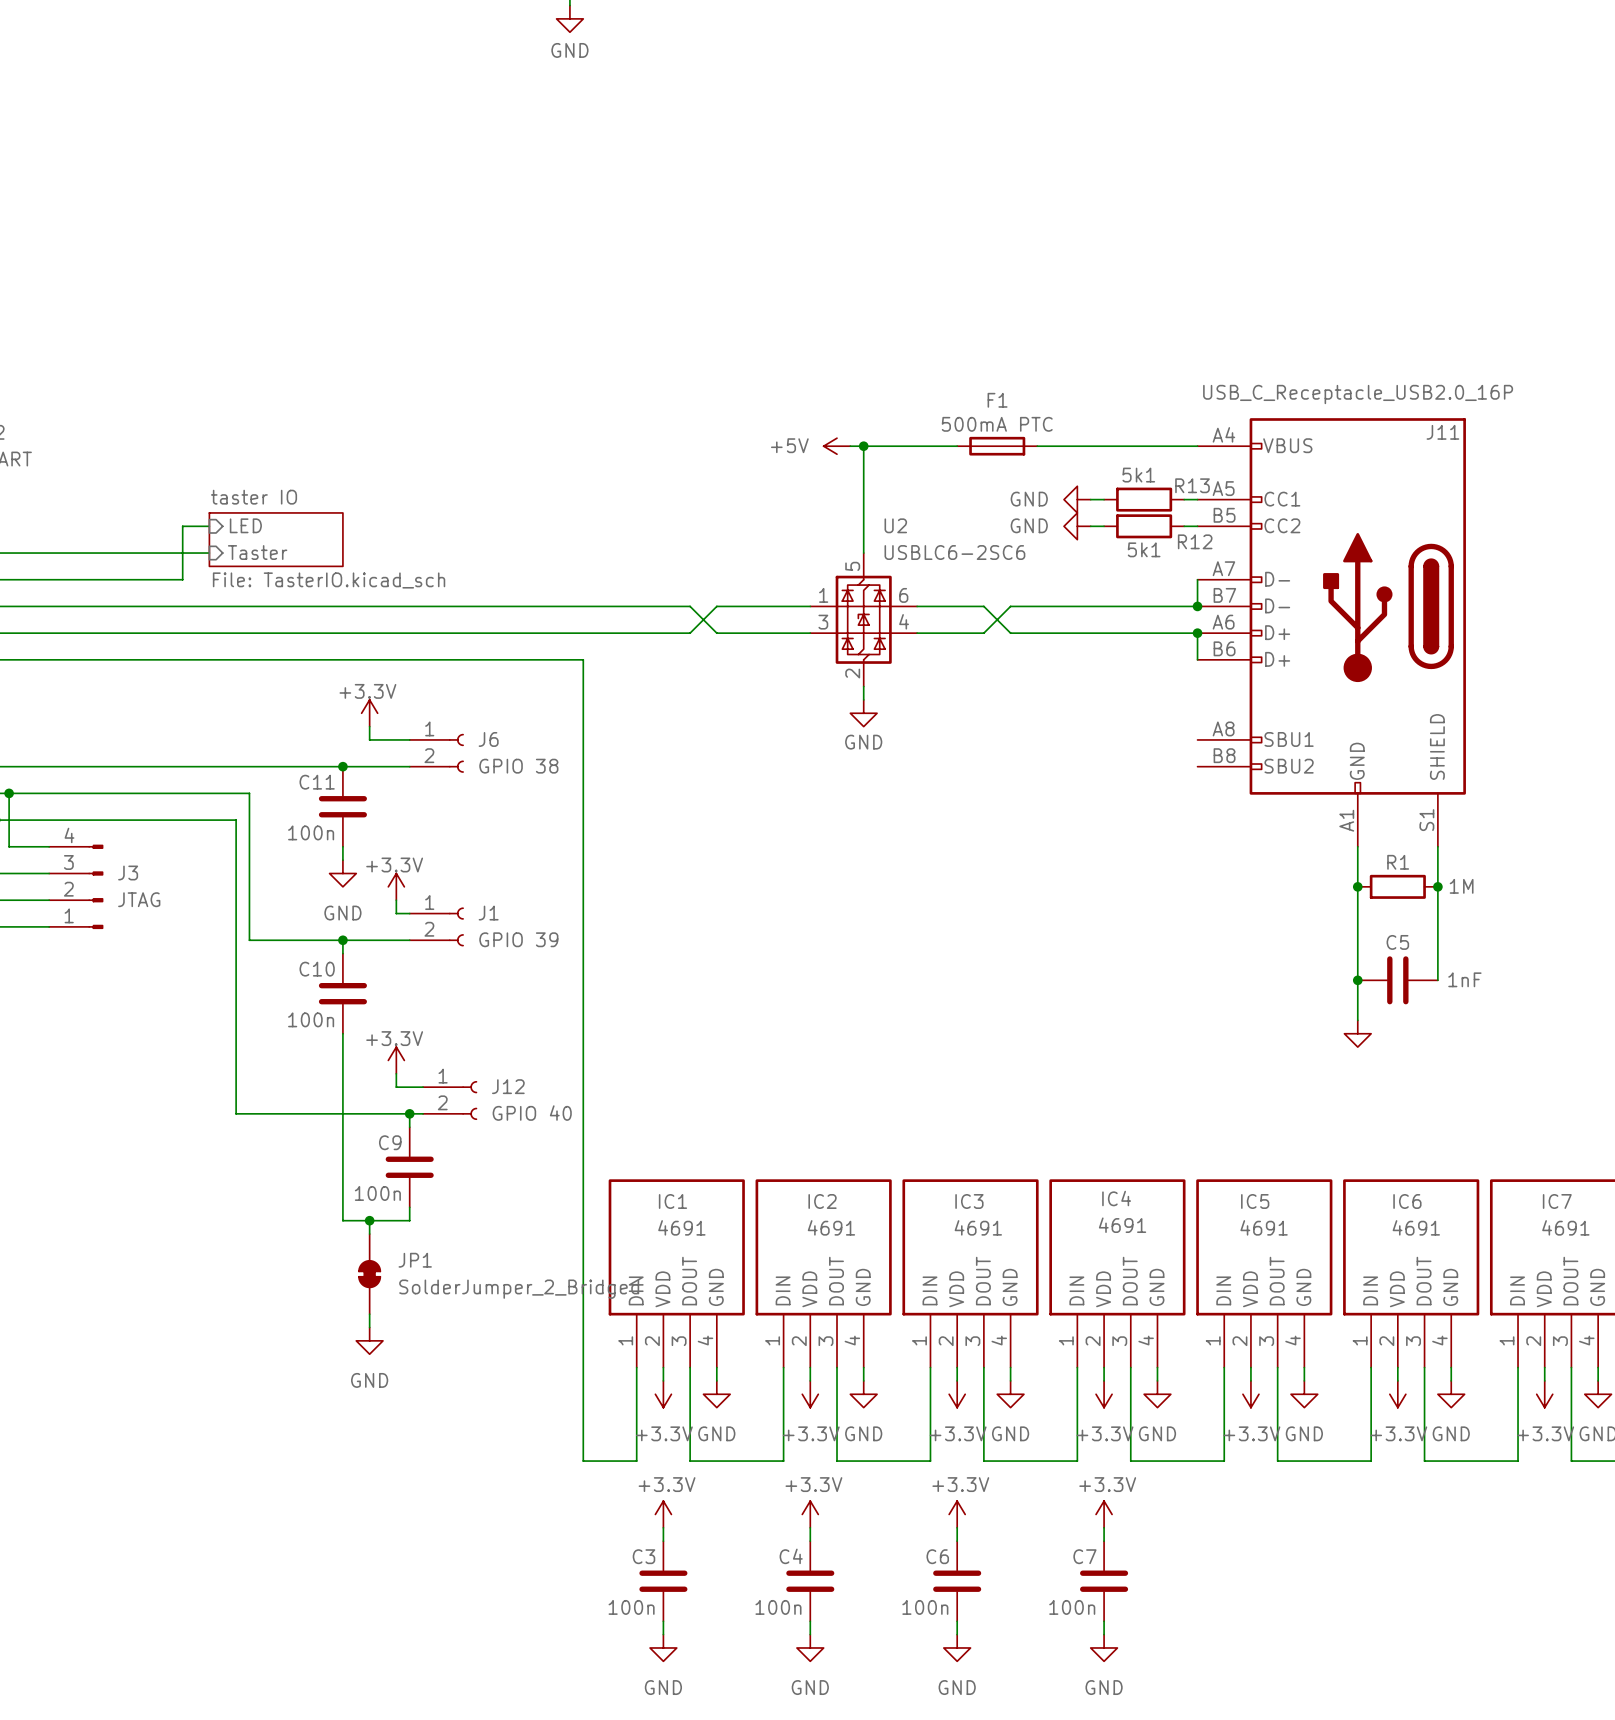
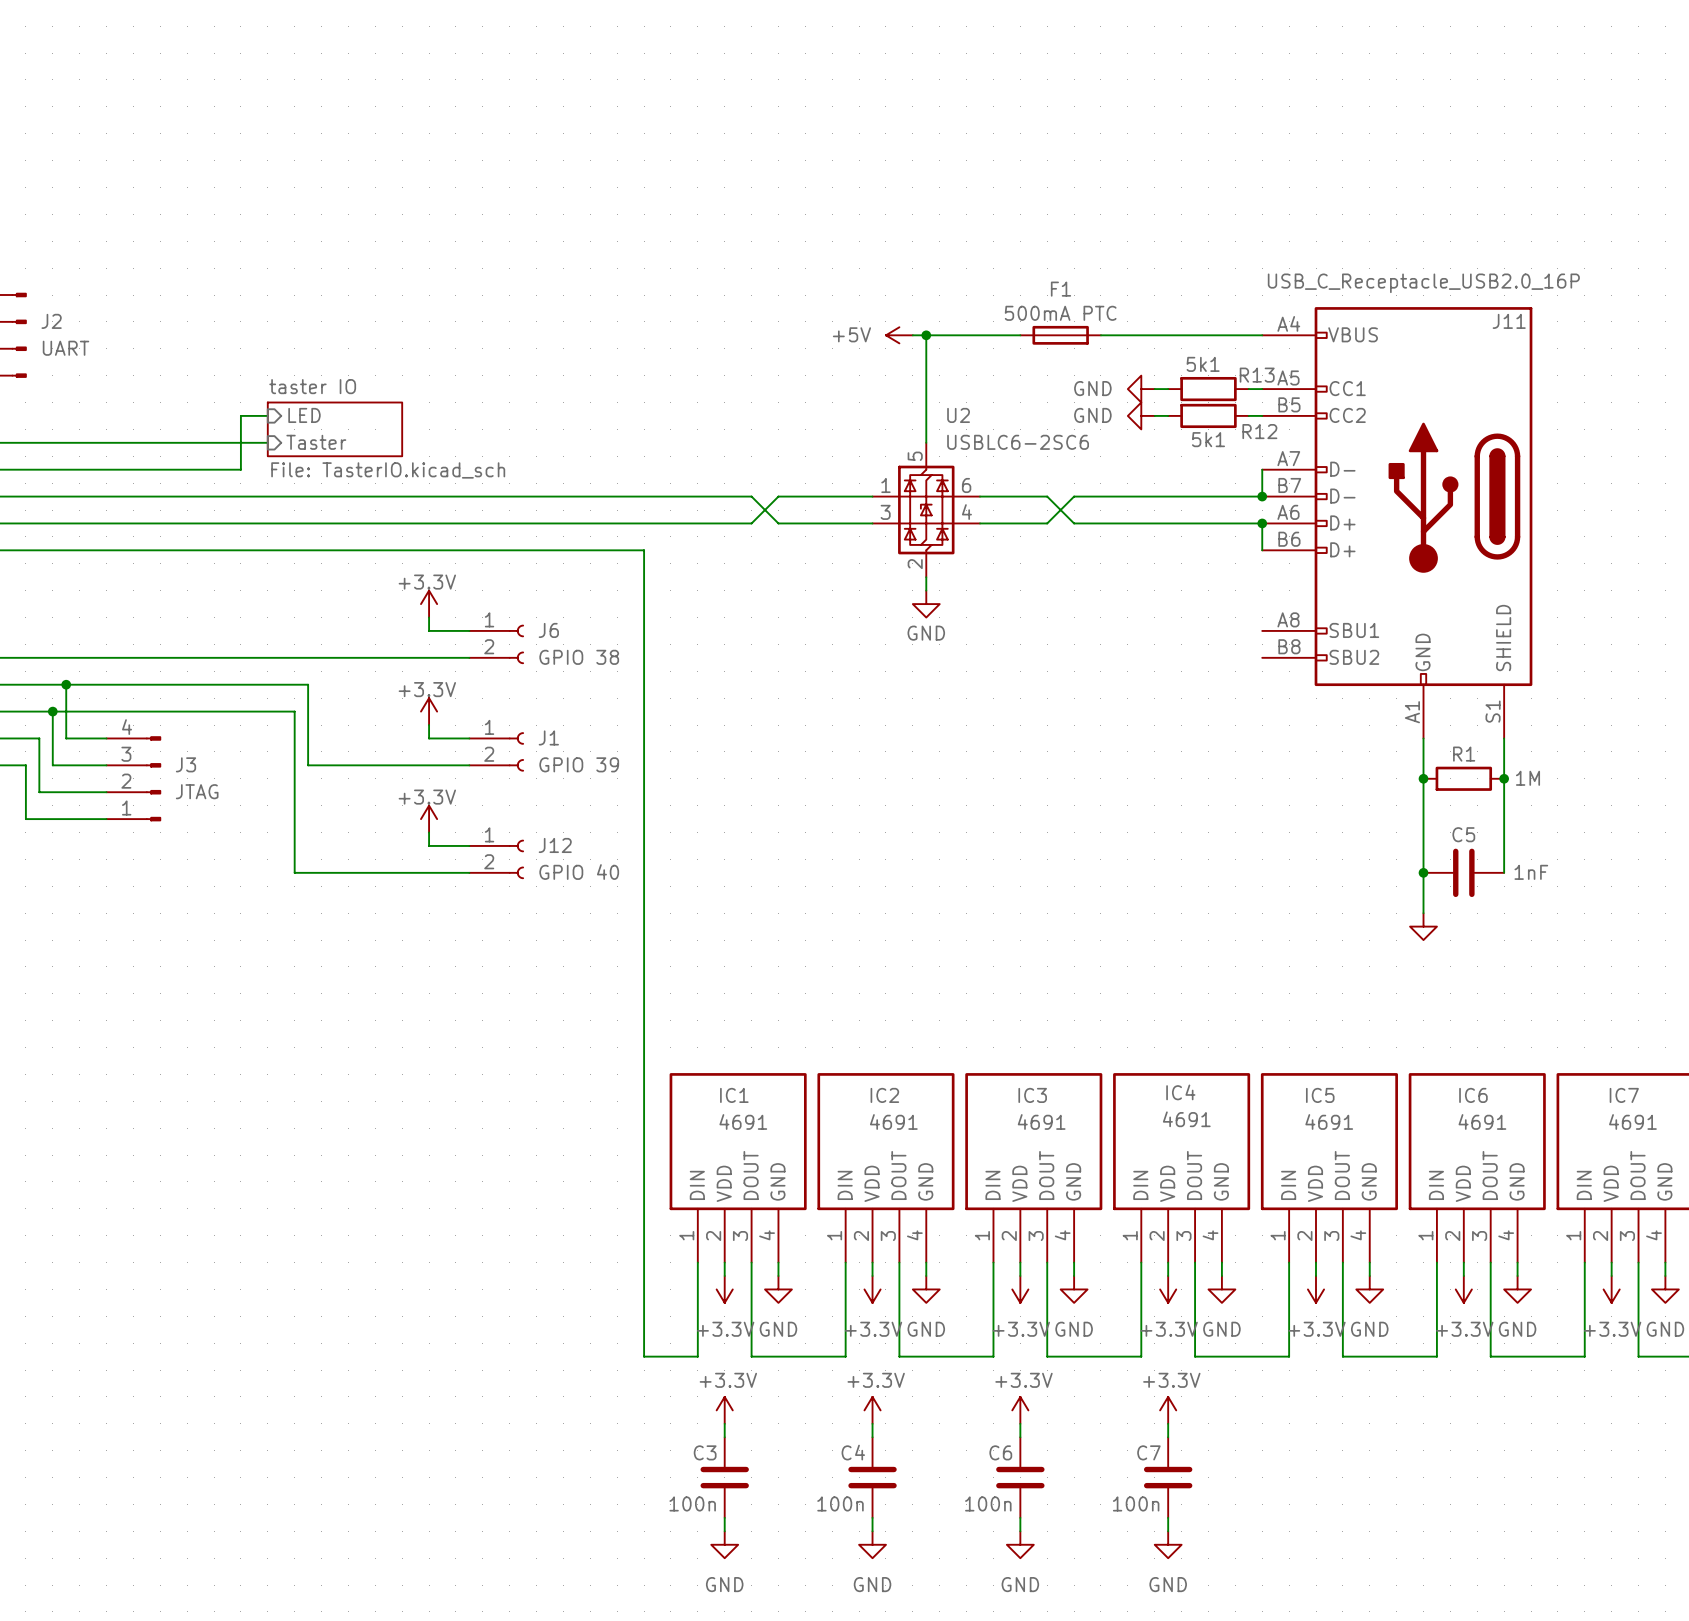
junction: (342, 766) -> none
C11: 100n (342, 806) -> none
power symbol: none -> +3.3V (429, 711)
wire: none -> (429, 725) (429, 738) (469, 738)
wire: (342, 846) (342, 860) -> none
wire: (249, 873) (249, 940) (409, 940) -> (308, 765) (469, 765)
power symbol: GND (342, 873) -> none
power symbol: +3.3V (396, 886) -> none
wire: (396, 900) (396, 913) (409, 913) -> none
power symbol: none -> +3.3V (429, 819)
J1 position: (436, 926) -> (496, 751)
wire: (342, 940) (342, 953) -> none
junction: (342, 940) -> none
wire: none -> (429, 832) (429, 845) (469, 845)
wire: (236, 980) (236, 1113) (423, 1113) -> (294, 872) (469, 872)
C10: 100n (342, 993) -> none
wire: (342, 1033) (342, 1220) (409, 1220) (409, 1207) -> none
power symbol: +3.3V (396, 1060) -> none
wire: (396, 1073) (396, 1087) (423, 1087) -> none
J12 position: (450, 1100) -> (496, 859)
wire: (409, 1113) (409, 1127) -> none
junction: (409, 1113) -> none
C9: 100n (409, 1167) -> none
wire: (369, 1220) (369, 1234) -> none
junction: (369, 1220) -> none
JP1: SolderJumper_2_Bridged (369, 1274) -> none
wire: (369, 1314) (369, 1327) -> none
power symbol: GND (369, 1340) -> none

